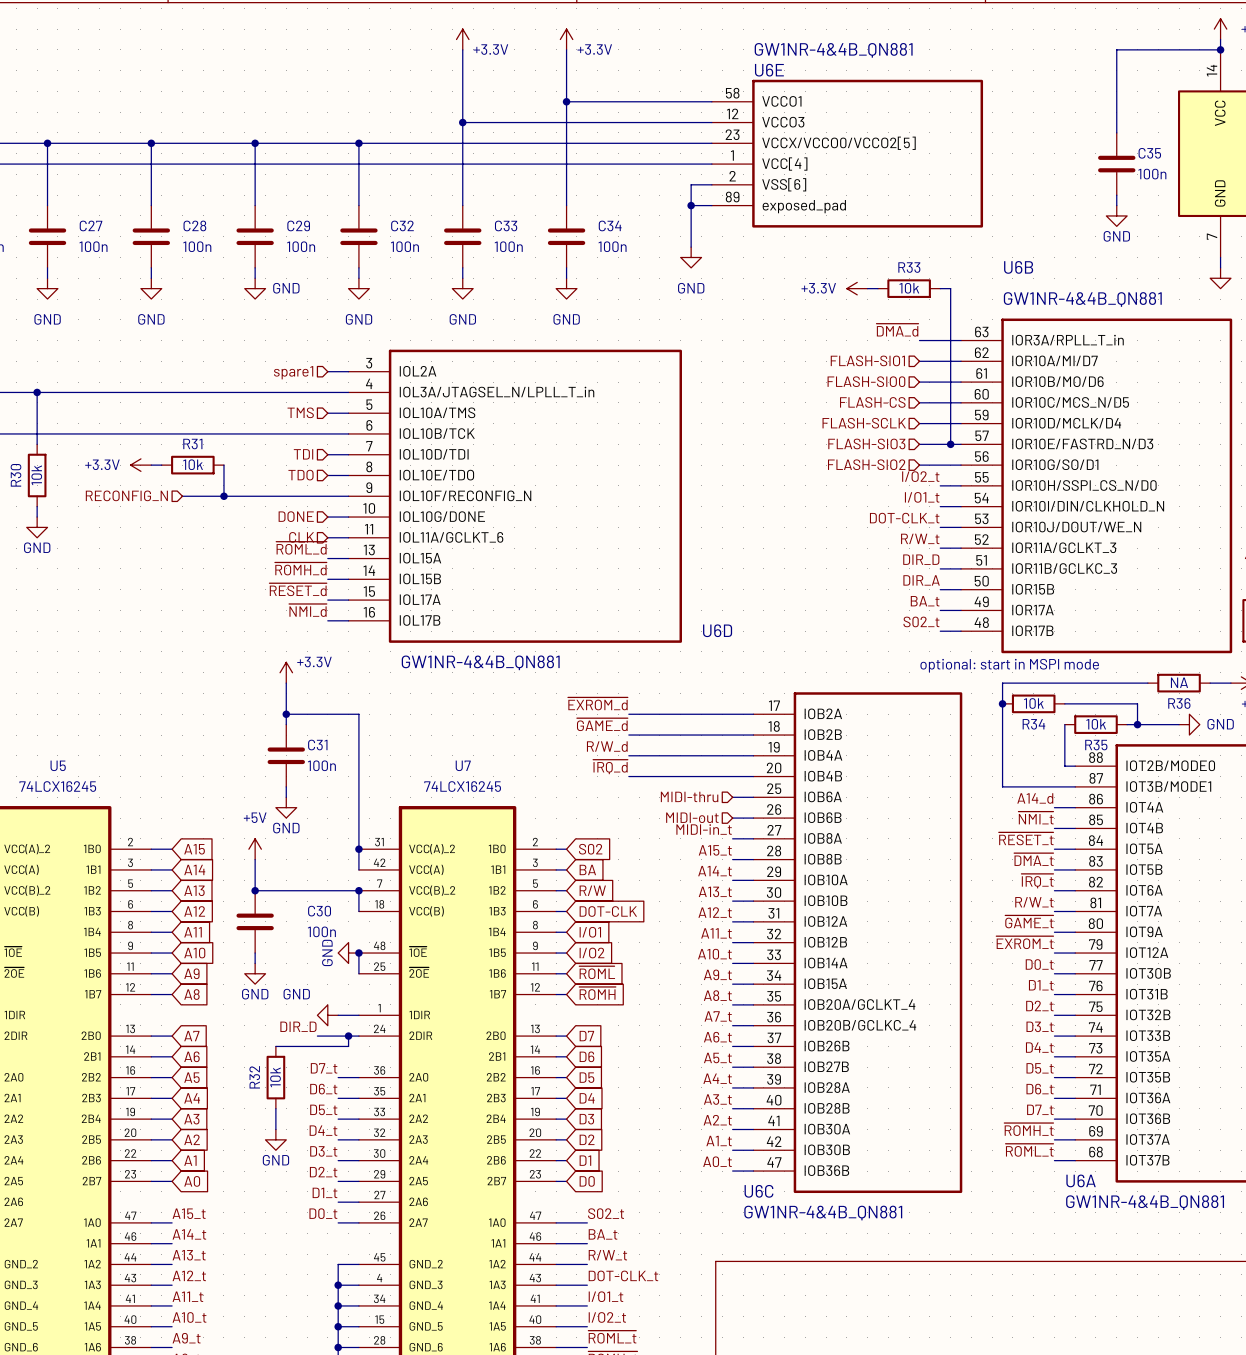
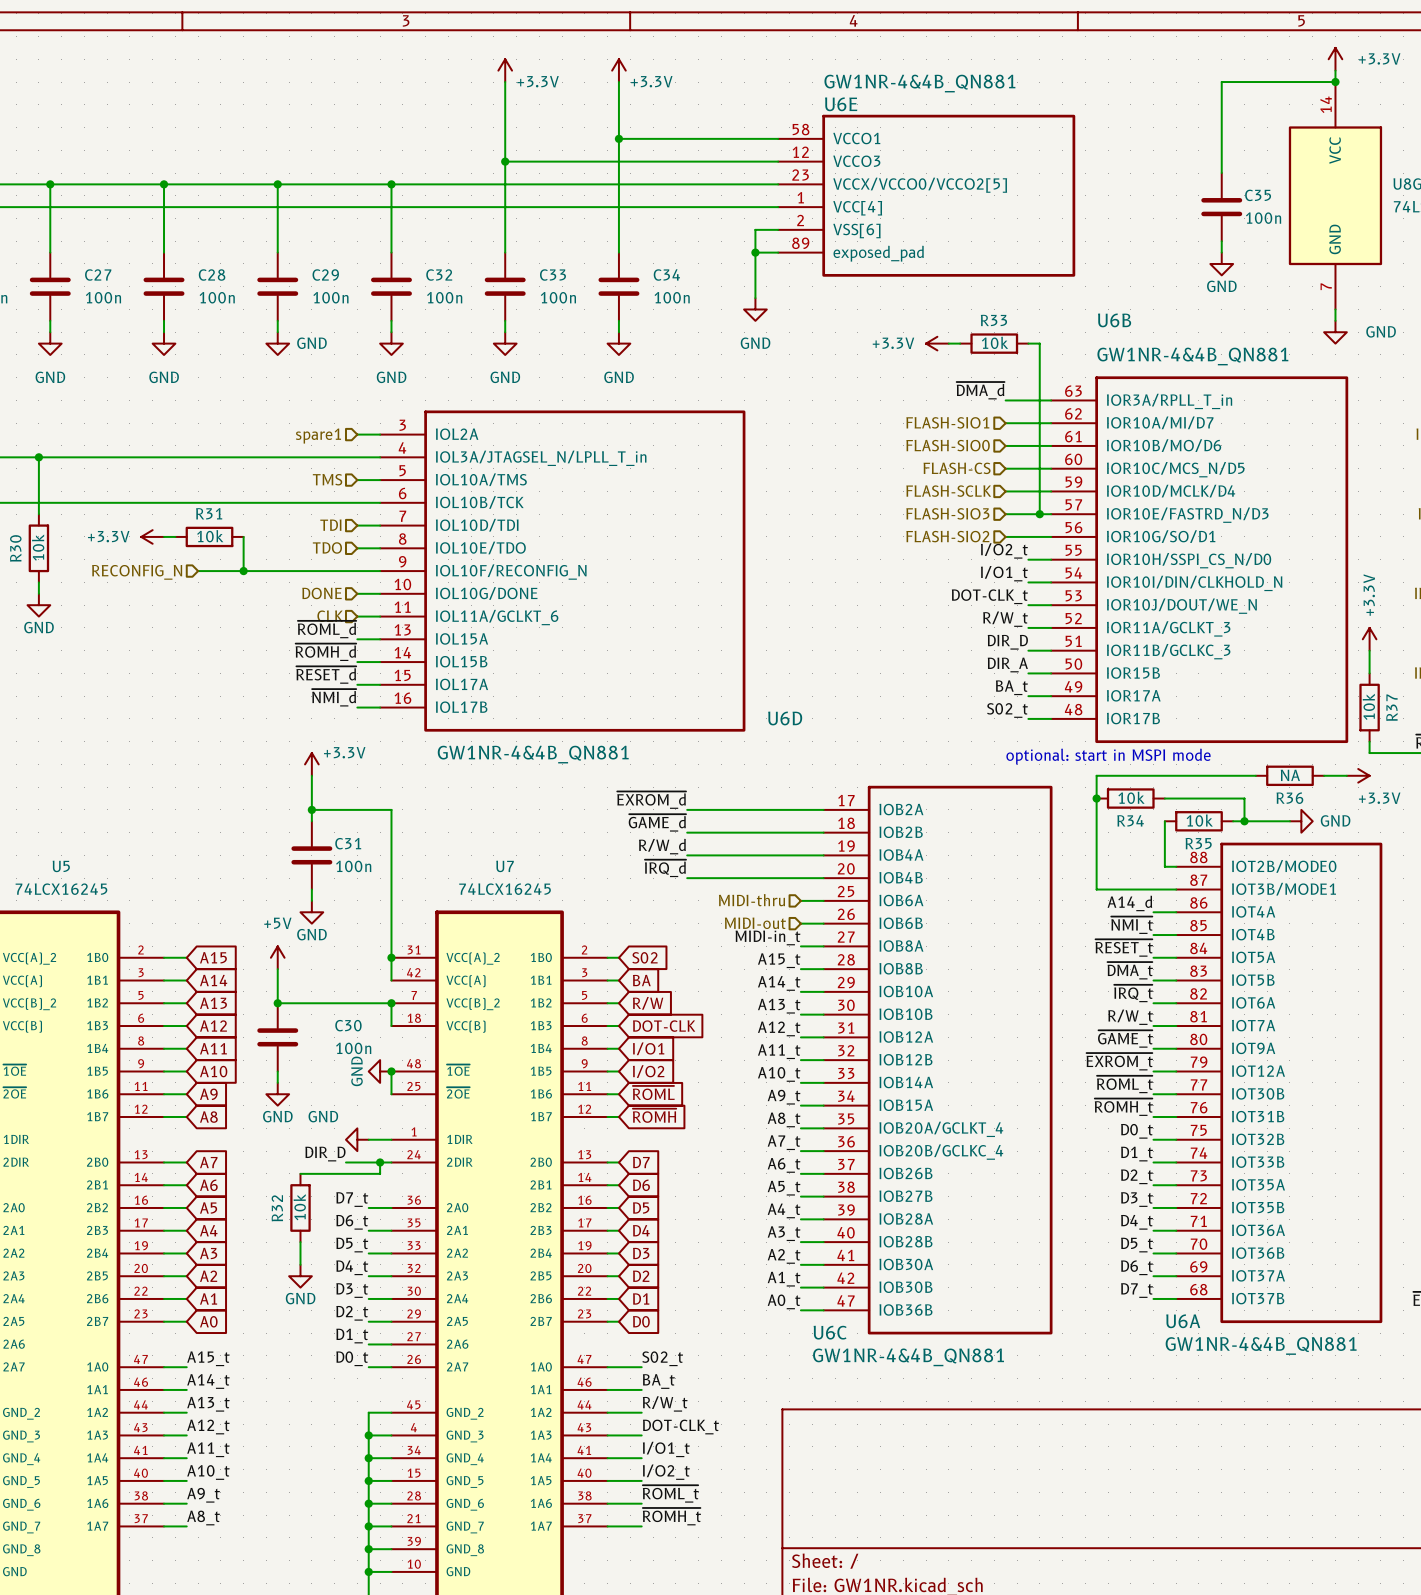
label: D0_t (1039, 964) -> ~{ROML_t} (1124, 1084)
label: D1_t (1041, 985) -> ~{ROMH_t} (1123, 1107)
label: D2_t (1039, 1005) -> D0_t (1137, 1131)
label: D3_t (1040, 1026) -> D1_t (1137, 1154)
label: D4_t (1039, 1047) -> D2_t (1137, 1176)
label: D5_t (1040, 1068) -> D3_t (1137, 1199)
label: D6_t (1040, 1089) -> D4_t (1137, 1222)
label: D7_t (1040, 1109) -> D5_t (1137, 1245)
label: ~{ROMH_t} (1028, 1129) -> D6_t (1137, 1267)
label: ~{ROML_t} (1029, 1150) -> D7_t (1137, 1290)

